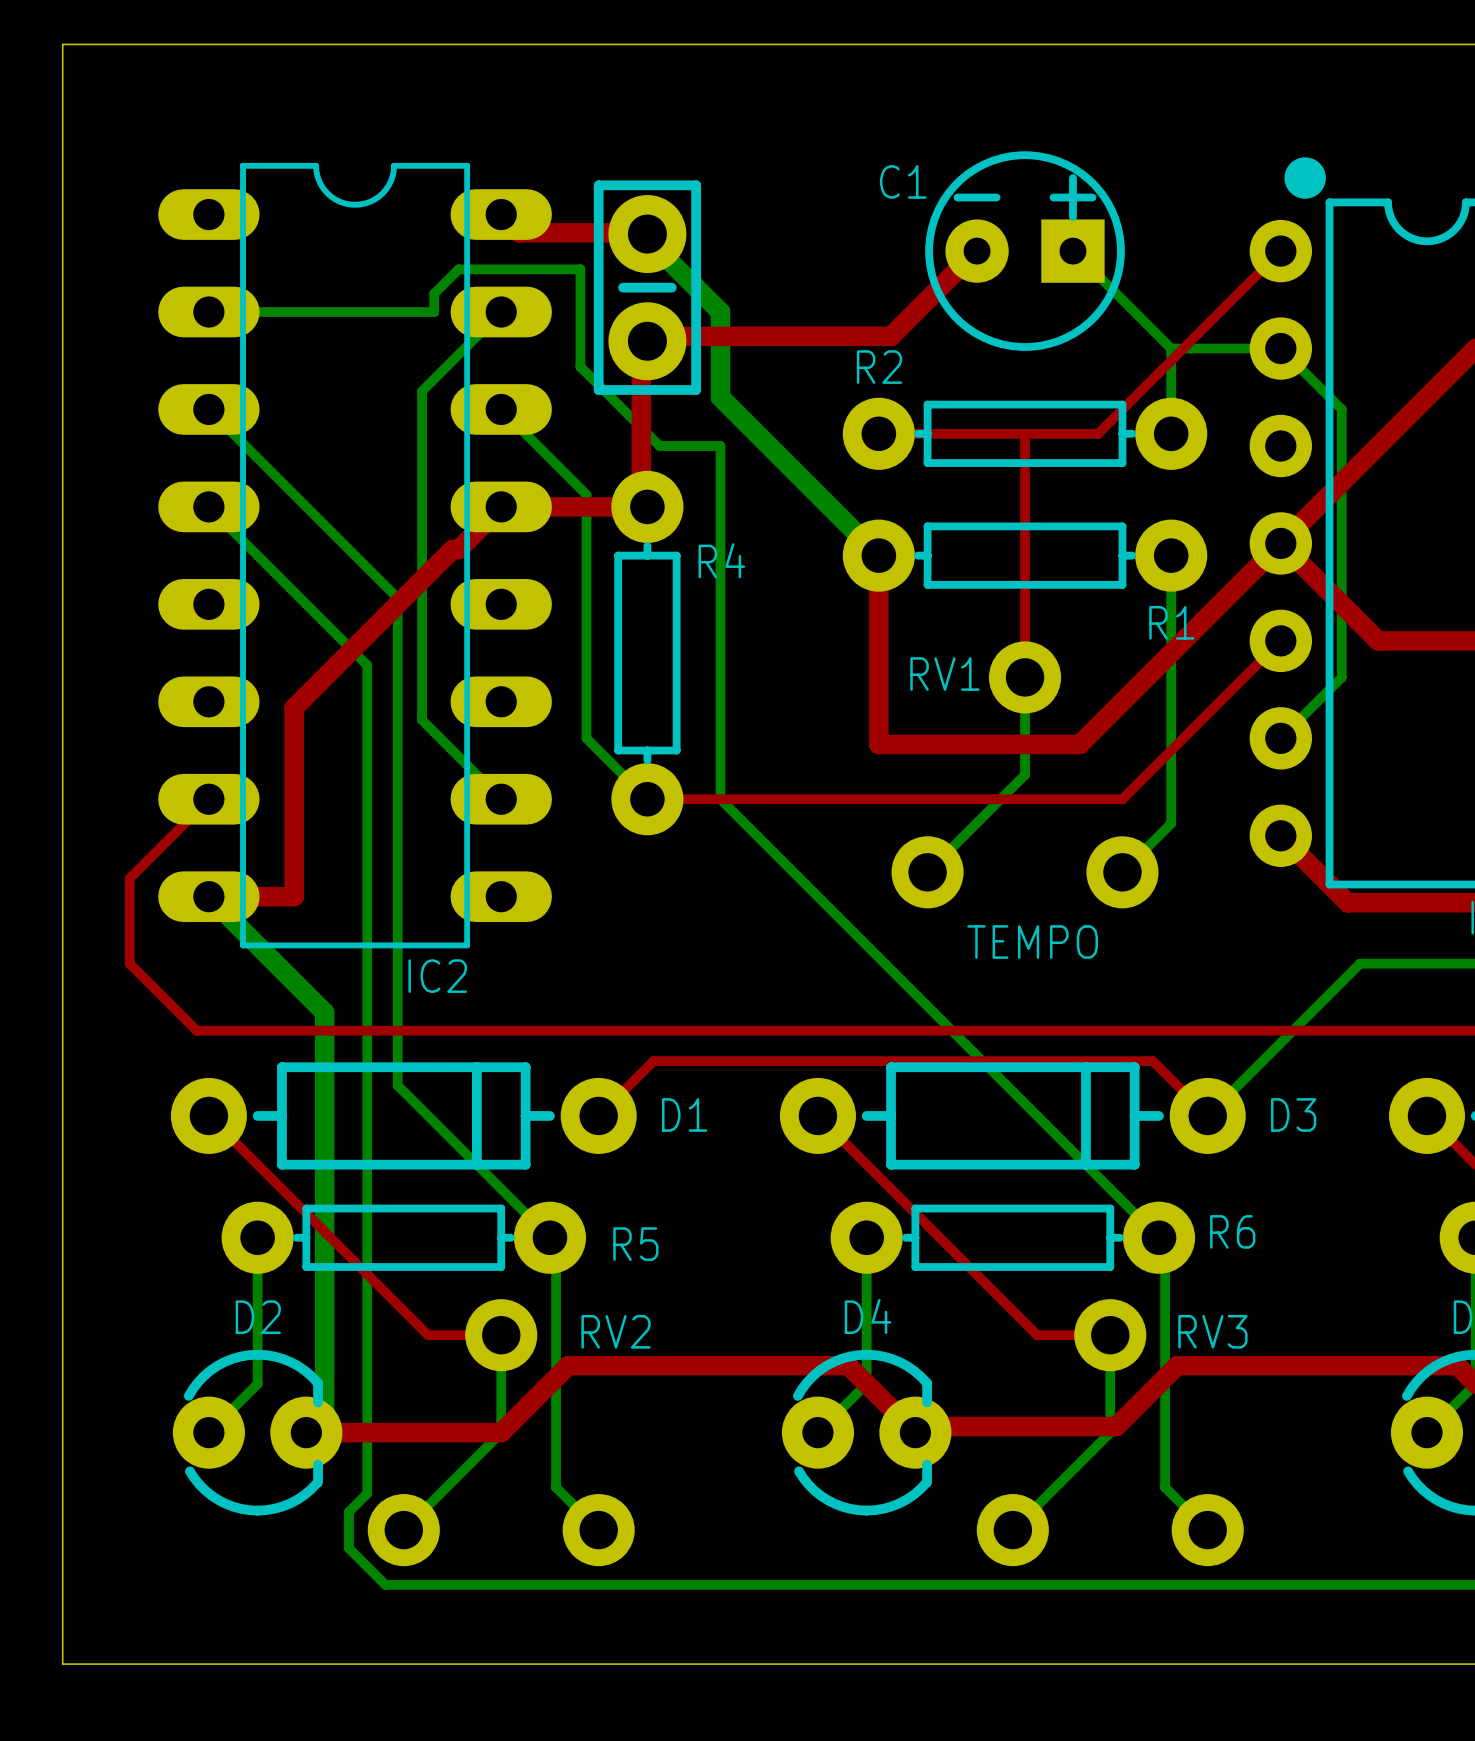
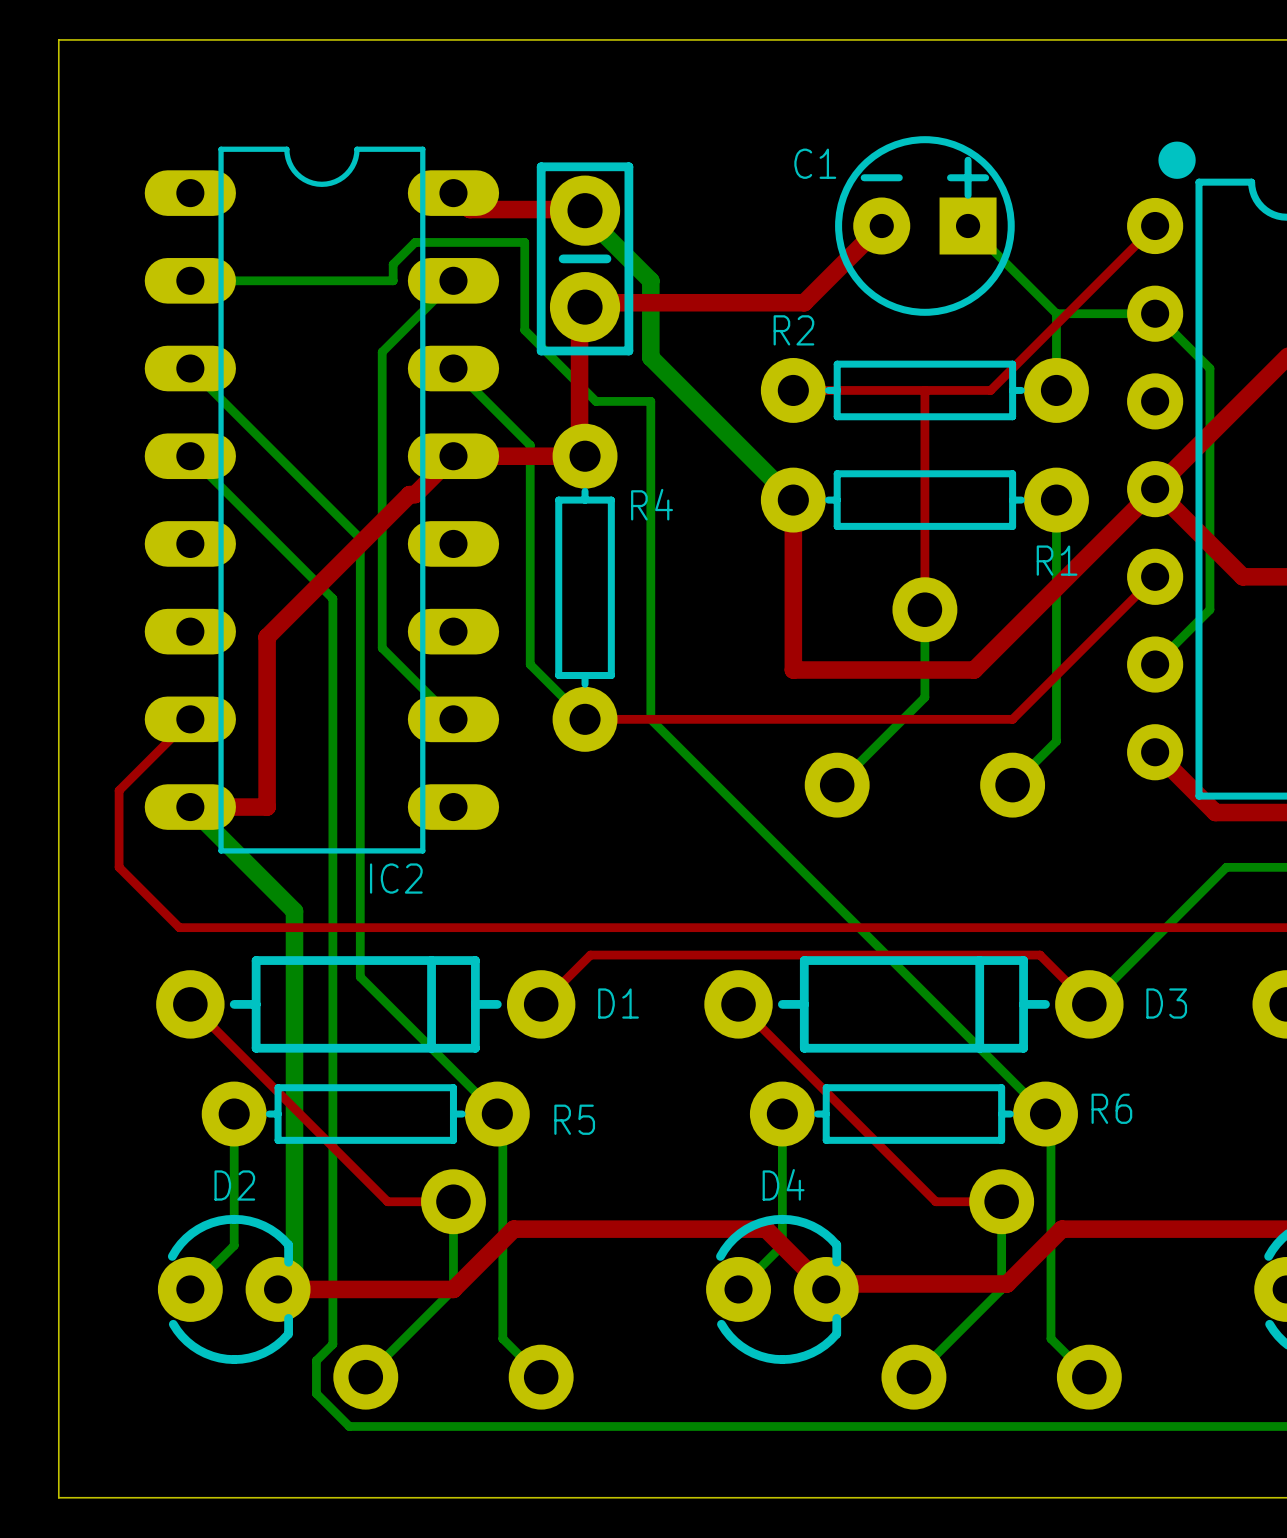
text: RV1 (944, 674) -> none
text: TEMPO (1032, 942) -> none
text: RV2 (616, 1331) -> none
text: RV3 (1212, 1331) -> none

